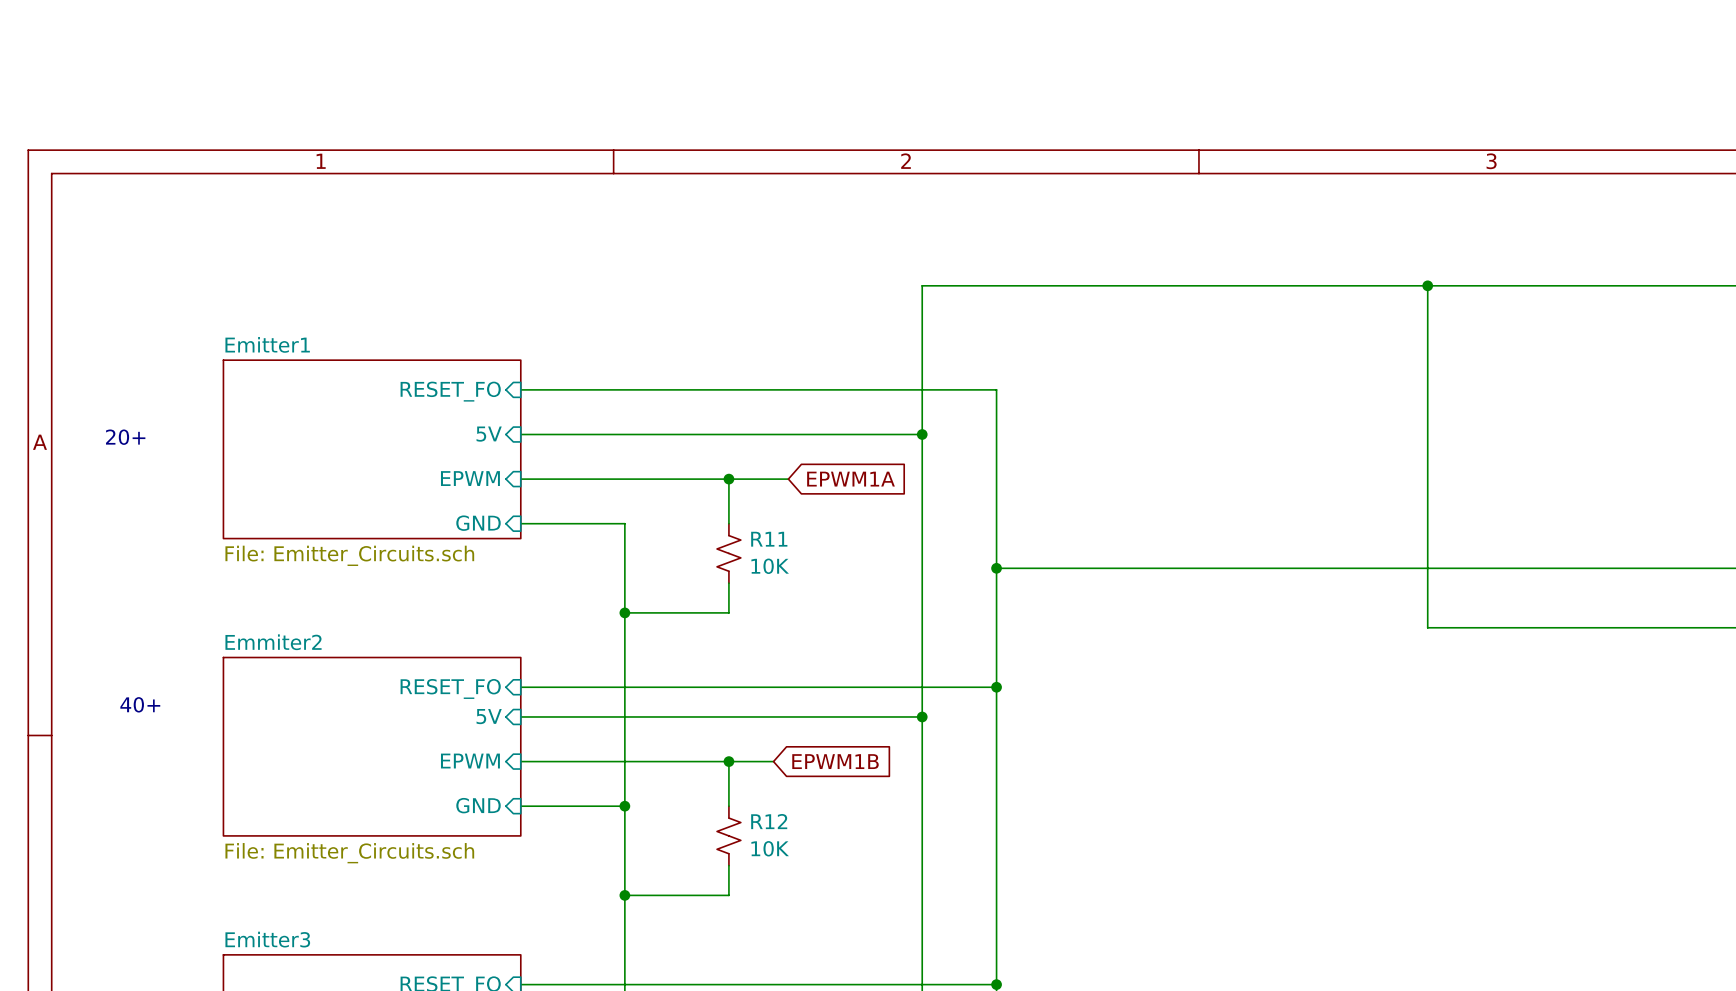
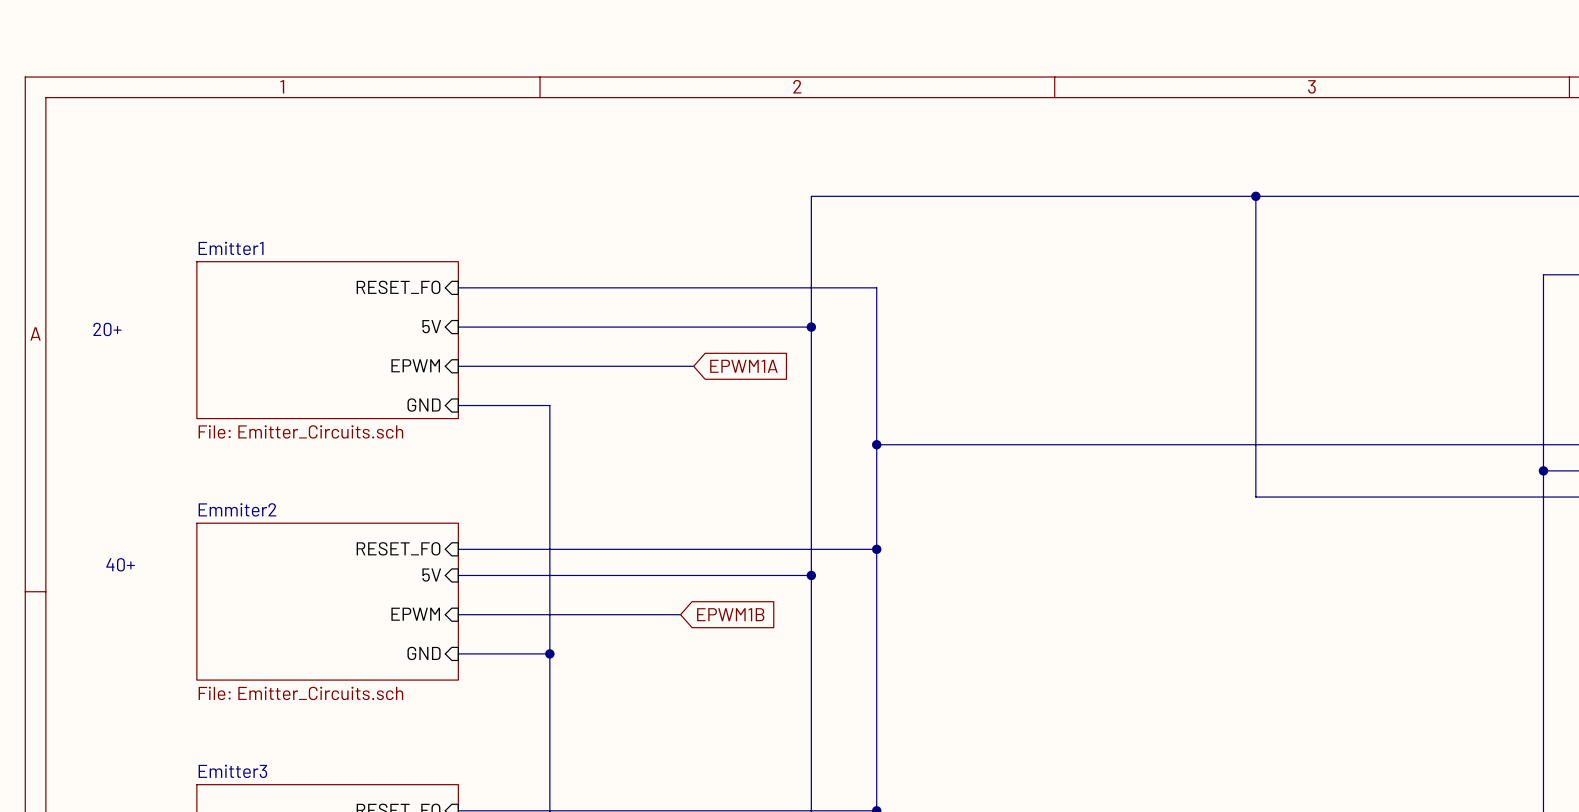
wire: (728, 479) (728, 523) -> none
junction: (728, 479) -> none
R11: 10K (728, 553) -> none
wire: (728, 583) (728, 612) (624, 612) -> none
junction: (624, 612) -> none
wire: (728, 761) (728, 806) -> none
junction: (728, 761) -> none
R12: 10K (728, 835) -> none
wire: (728, 865) (728, 895) (624, 895) -> none
junction: (624, 895) -> none

